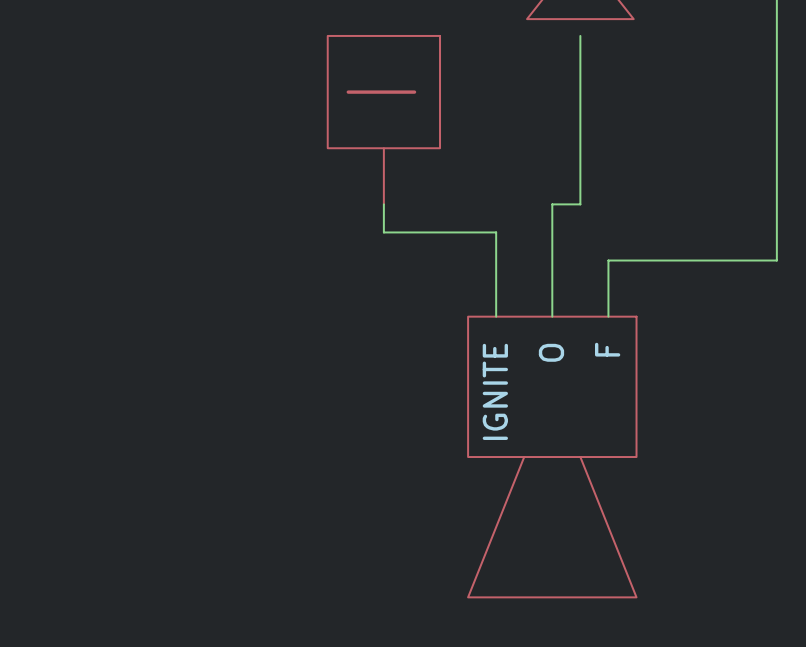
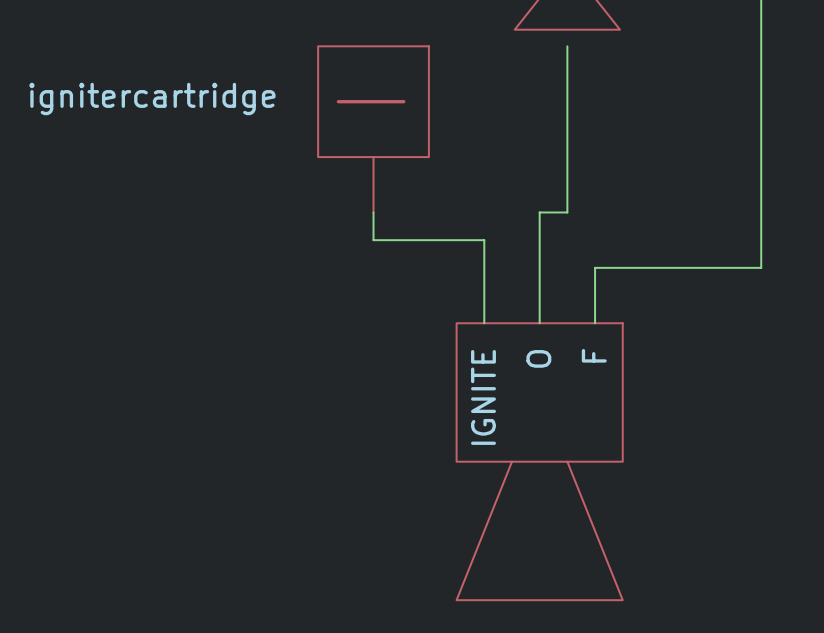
ignitercartridge name: none -> ignitercartridge (152, 98)

